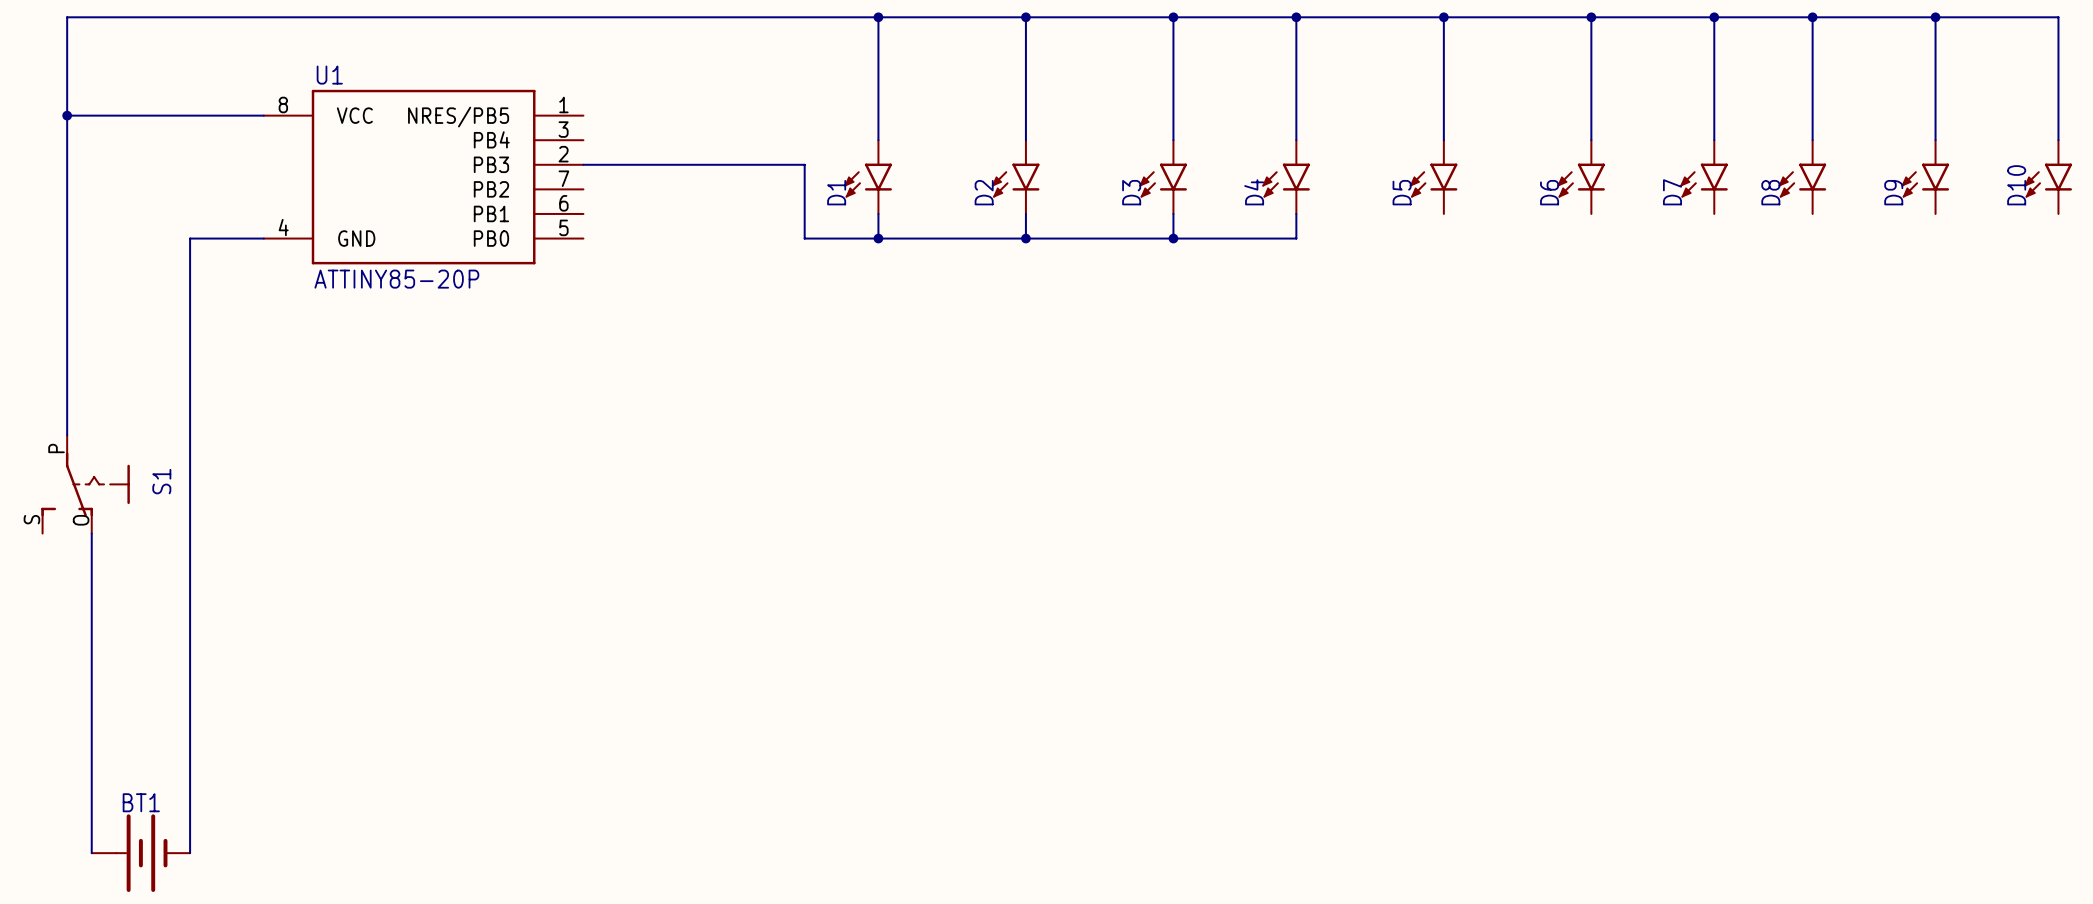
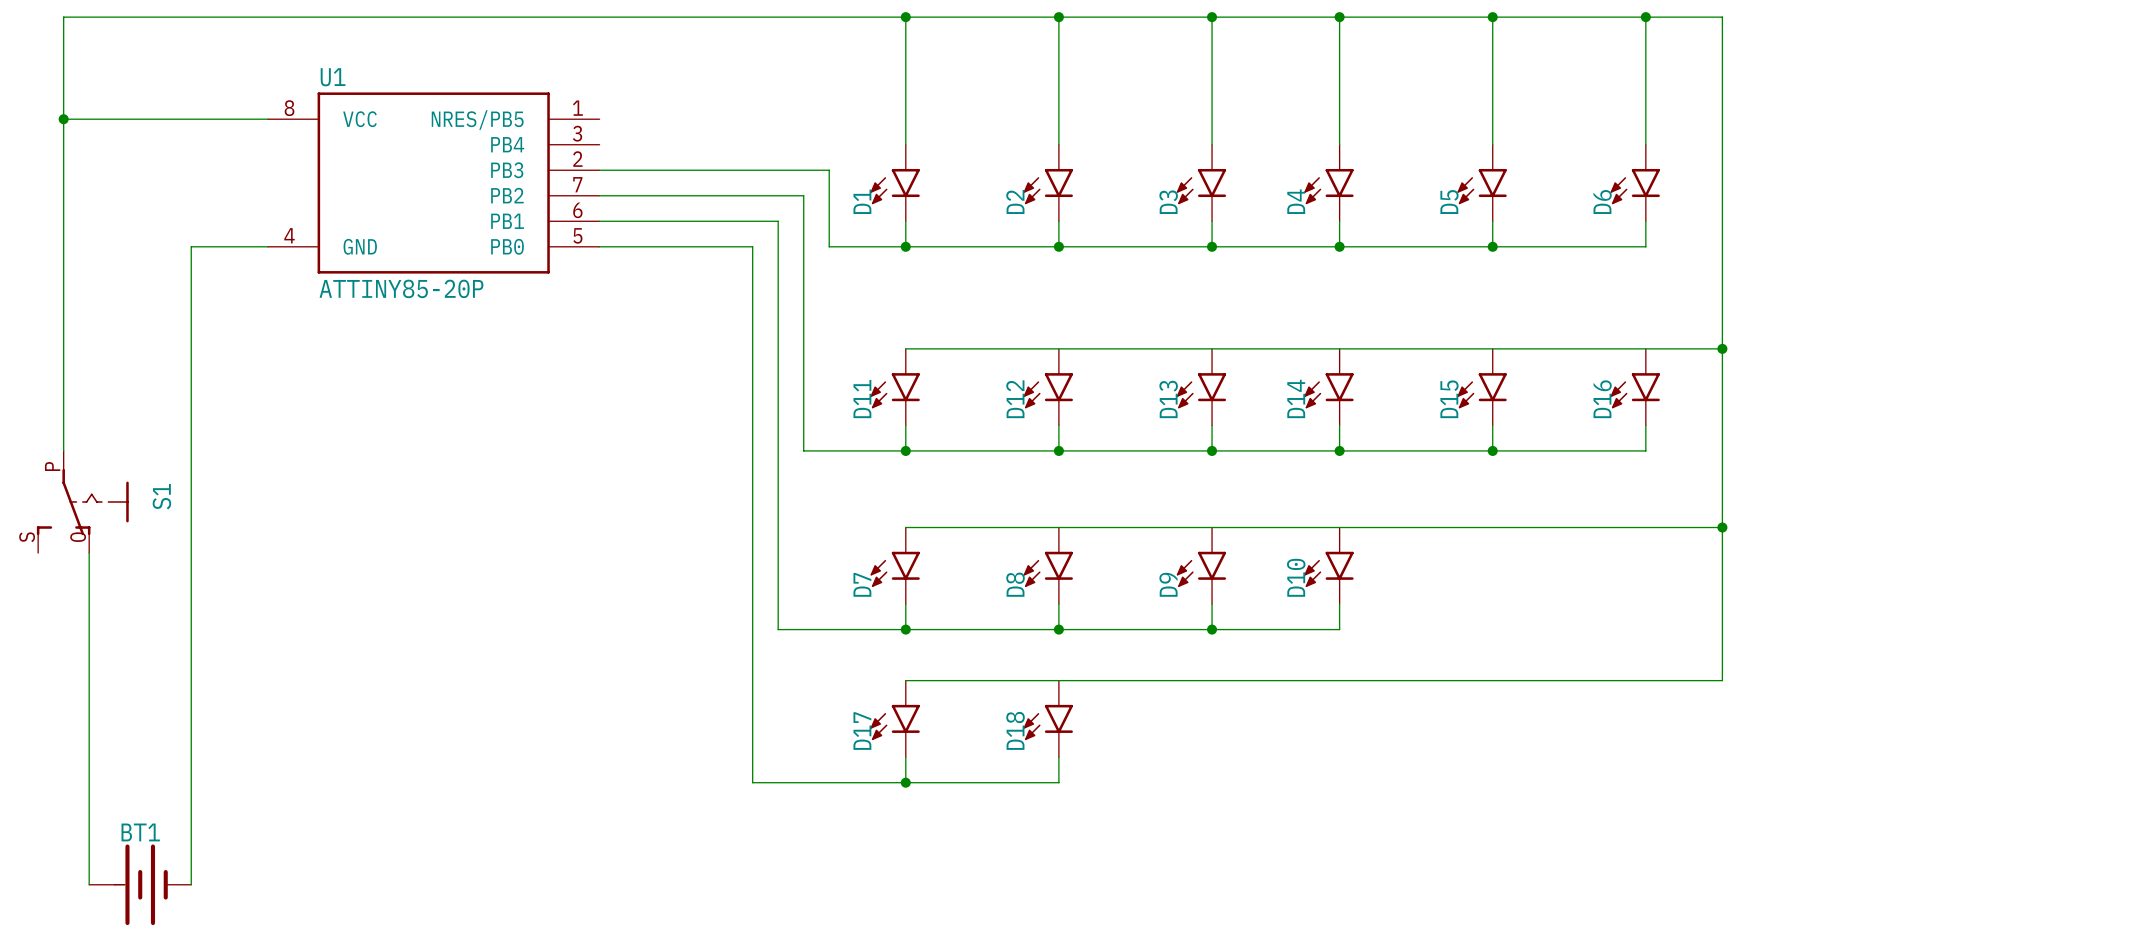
wire: (1665, 17) (2058, 17) (2058, 140) -> (1722, 17) (1722, 680) (905, 680)
wire: (1714, 17) (1714, 140) -> none
junction: (1714, 17) -> none
wire: (1812, 17) (1812, 140) -> none
junction: (1812, 17) -> none
wire: (1935, 17) (1935, 140) -> none
junction: (1935, 17) -> none
D7 position: (1704, 177) -> (895, 565)
D8 position: (1802, 177) -> (1048, 565)
D9 position: (1925, 177) -> (1201, 565)
D10 position: (2048, 177) -> (1329, 565)
wire: none -> (599, 195) (803, 195) (803, 450) (1645, 450) (1645, 425)
wire: none -> (599, 221) (778, 221) (778, 629) (1339, 629) (1339, 604)
wire: none -> (1492, 221) (1492, 246)
wire: none -> (1645, 221) (1645, 246) (1339, 246)
wire: none -> (599, 246) (752, 246) (752, 782) (1058, 782) (1058, 757)
junction: none -> (1339, 246)
junction: none -> (1492, 246)
wire: none -> (905, 348) (1722, 348)
junction: none -> (1722, 348)
D11: none -> (895, 387)
D12: none -> (1048, 387)
D13: none -> (1201, 387)
D14: none -> (1329, 387)
D15: none -> (1482, 387)
D16: none -> (1635, 387)
wire: none -> (905, 425) (905, 450)
wire: none -> (1058, 425) (1058, 450)
wire: none -> (1212, 425) (1212, 450)
wire: none -> (1339, 425) (1339, 450)
wire: none -> (1492, 425) (1492, 450)
junction: none -> (905, 450)
junction: none -> (1058, 450)
junction: none -> (1212, 450)
junction: none -> (1339, 450)
junction: none -> (1492, 450)
wire: none -> (905, 527) (1722, 527)
junction: none -> (1722, 527)
wire: none -> (905, 604) (905, 629)
wire: none -> (1058, 604) (1058, 629)
wire: none -> (1212, 604) (1212, 629)
junction: none -> (905, 629)
junction: none -> (1058, 629)
junction: none -> (1212, 629)
D17: none -> (895, 718)
D18: none -> (1048, 718)
wire: none -> (905, 757) (905, 782)
junction: none -> (905, 782)

